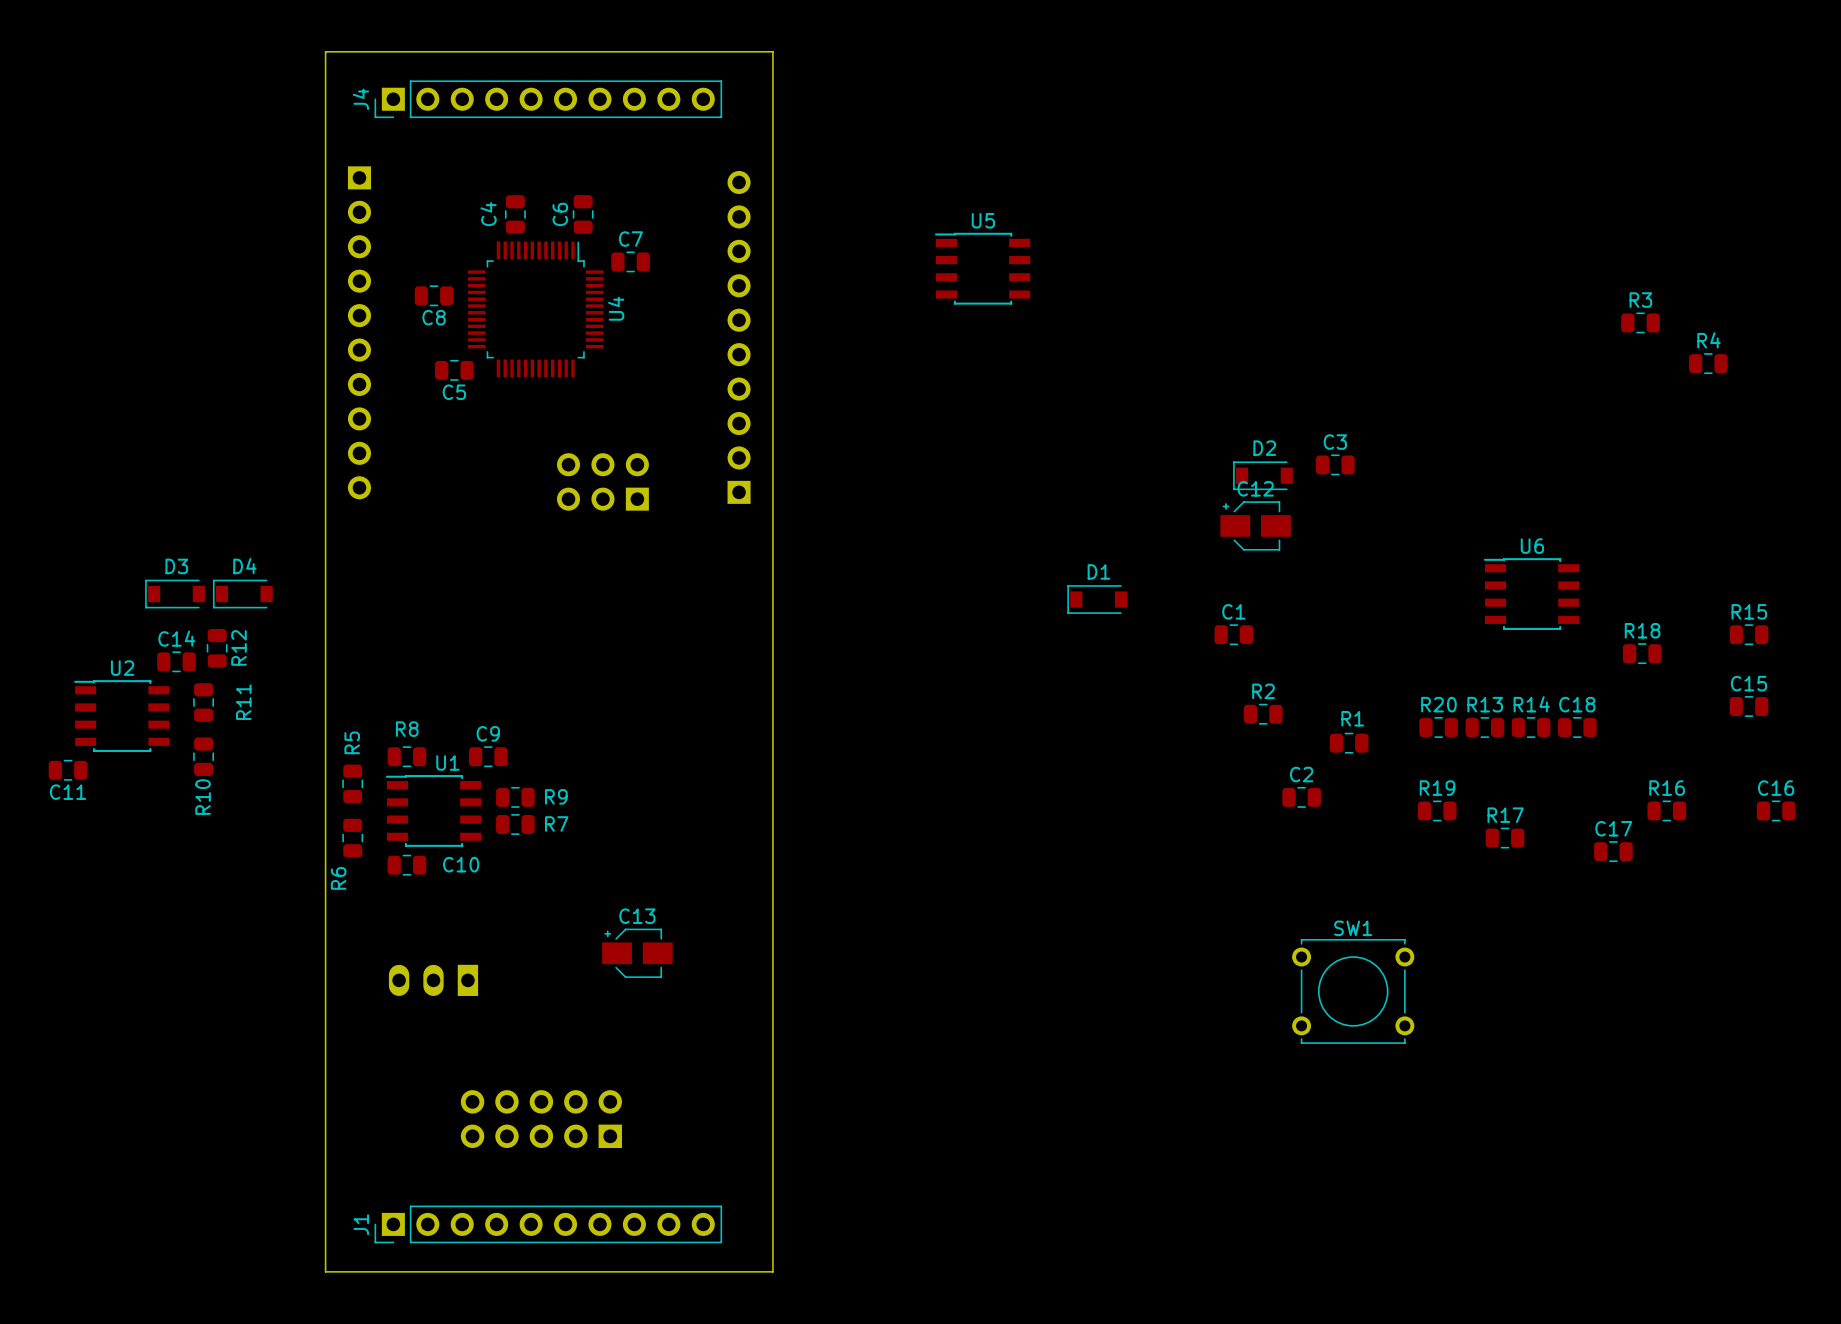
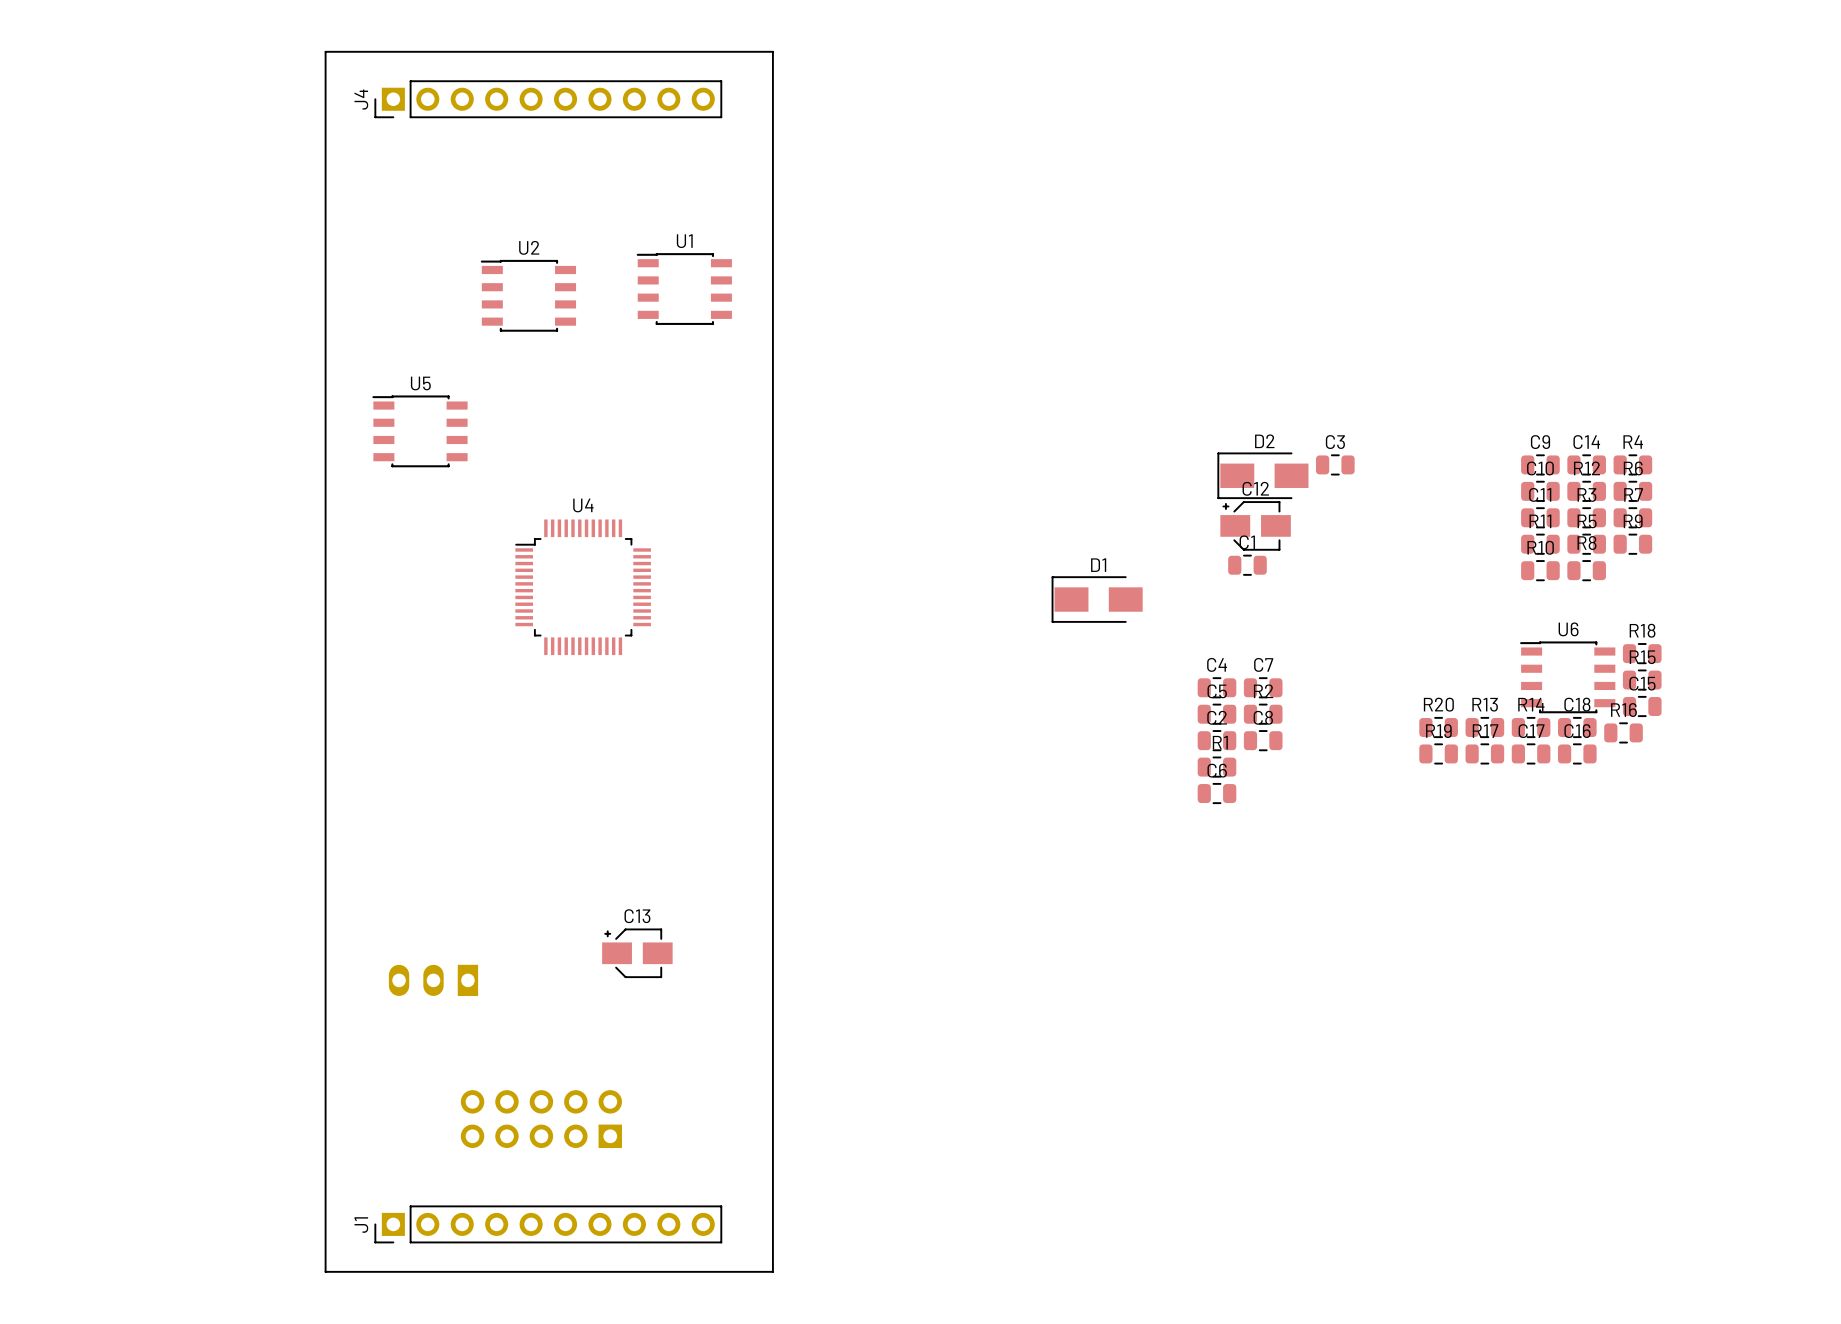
C4 rotation: 0° (515, 214) -> 90° clockwise (1216, 687)
C4 position: (515, 214) -> (1216, 687)
C6 rotation: 0° (583, 214) -> 90° clockwise (1216, 793)
C6 position: (583, 214) -> (1216, 793)
C7 position: (630, 261) -> (1263, 687)
U5 position: (982, 268) -> (419, 431)
C8 position: (434, 295) -> (1263, 740)
U4 rotation: 0° (535, 309) -> 90° counterclockwise (583, 587)
U4 position: (535, 309) -> (583, 587)
C8 name position: C8 (434, 317) -> C8 (1263, 717)
R3 position: (1640, 322) -> (1586, 517)
part: (359, 332) -> none
part: (739, 337) -> none
R4 position: (1708, 363) -> (1632, 464)
C5 position: (454, 370) -> (1216, 714)
C5 name position: C5 (454, 392) -> C5 (1217, 691)
D2 footprint: [1233, 461, 1293, 491] -> [1217, 452, 1309, 499]
part: (602, 481) -> none
D1 footprint: [1067, 585, 1128, 614] -> [1051, 576, 1143, 623]
D3: (175, 594) -> none
D4: (242, 594) -> none
U6 position: (1531, 594) -> (1567, 677)
C1 position: (1233, 634) -> (1247, 565)
R15 position: (1748, 634) -> (1642, 680)
R12 name position: R12 (239, 647) -> R12 (1587, 468)
R12 rotation: 0° (217, 648) -> 90° clockwise (1586, 491)
R12 position: (217, 648) -> (1586, 491)
C14 position: (176, 661) -> (1586, 464)
R11 rotation: 0° (203, 702) -> 90° clockwise (1540, 544)
R11 position: (203, 702) -> (1540, 544)
R11 name position: R11 (243, 702) -> R11 (1540, 521)
C15 position: (1748, 706) -> (1642, 706)
U2 position: (121, 716) -> (528, 295)
R1 position: (1349, 743) -> (1216, 767)
R10 rotation: 0° (203, 756) -> 90° clockwise (1540, 570)
R10 position: (203, 756) -> (1540, 570)
R8 position: (406, 756) -> (1586, 570)
C9 position: (488, 756) -> (1540, 464)
U1 name position: U1 (447, 762) -> U1 (684, 241)
C11 position: (68, 770) -> (1540, 517)
R5 rotation: 0° (352, 783) -> 90° clockwise (1586, 544)
R5 position: (352, 783) -> (1586, 544)
C11 name position: C11 (68, 792) -> C11 (1540, 494)
R9 name position: R9 (556, 796) -> R9 (1633, 521)
R10 name position: R10 (203, 797) -> R10 (1540, 547)
R9 position: (515, 797) -> (1632, 544)
C2 position: (1301, 797) -> (1216, 740)
U1 position: (433, 810) -> (684, 289)
R19 position: (1437, 810) -> (1438, 753)
R16 position: (1666, 810) -> (1623, 732)
C16 position: (1776, 810) -> (1577, 753)
R7 name position: R7 (556, 823) -> R7 (1633, 494)
R7 position: (515, 824) -> (1632, 517)
R6 rotation: 0° (352, 838) -> 90° clockwise (1632, 491)
R6 position: (352, 838) -> (1632, 491)
R17 position: (1504, 838) -> (1484, 753)
C17 position: (1613, 851) -> (1531, 753)
C10 name position: C10 (461, 864) -> C10 (1540, 468)
C10 position: (406, 865) -> (1540, 491)
R6 name position: R6 (338, 878) -> R6 (1633, 468)
SW1: (1353, 991) -> none

